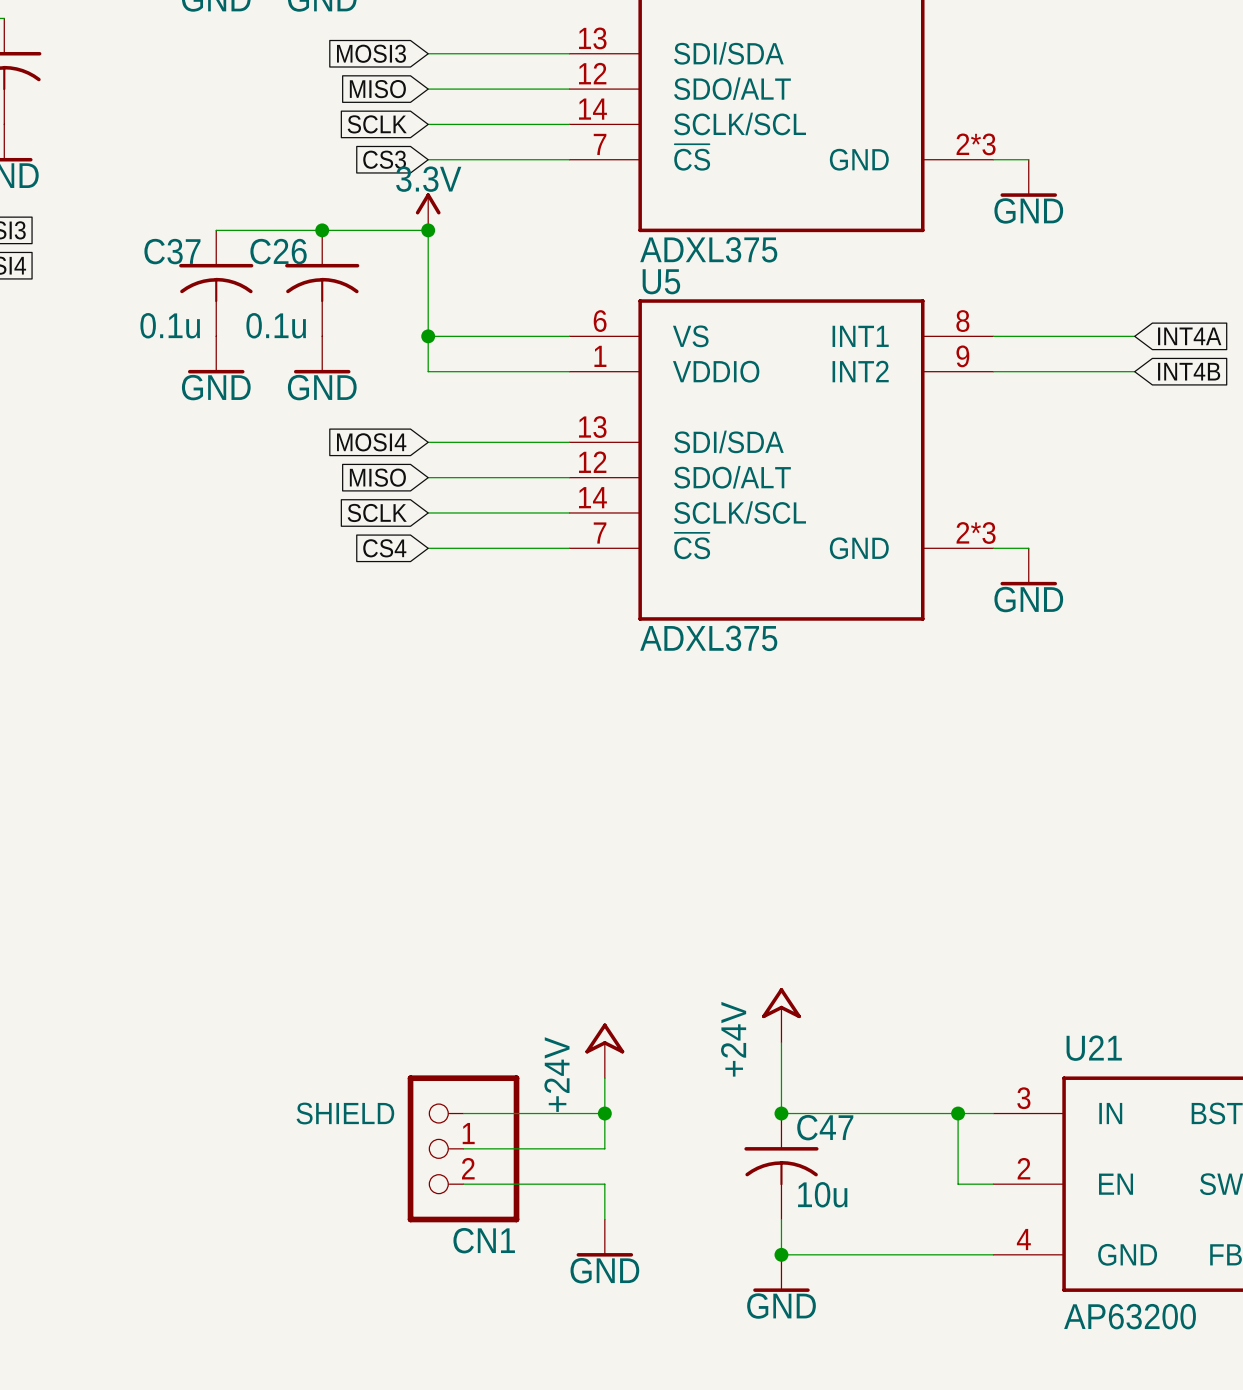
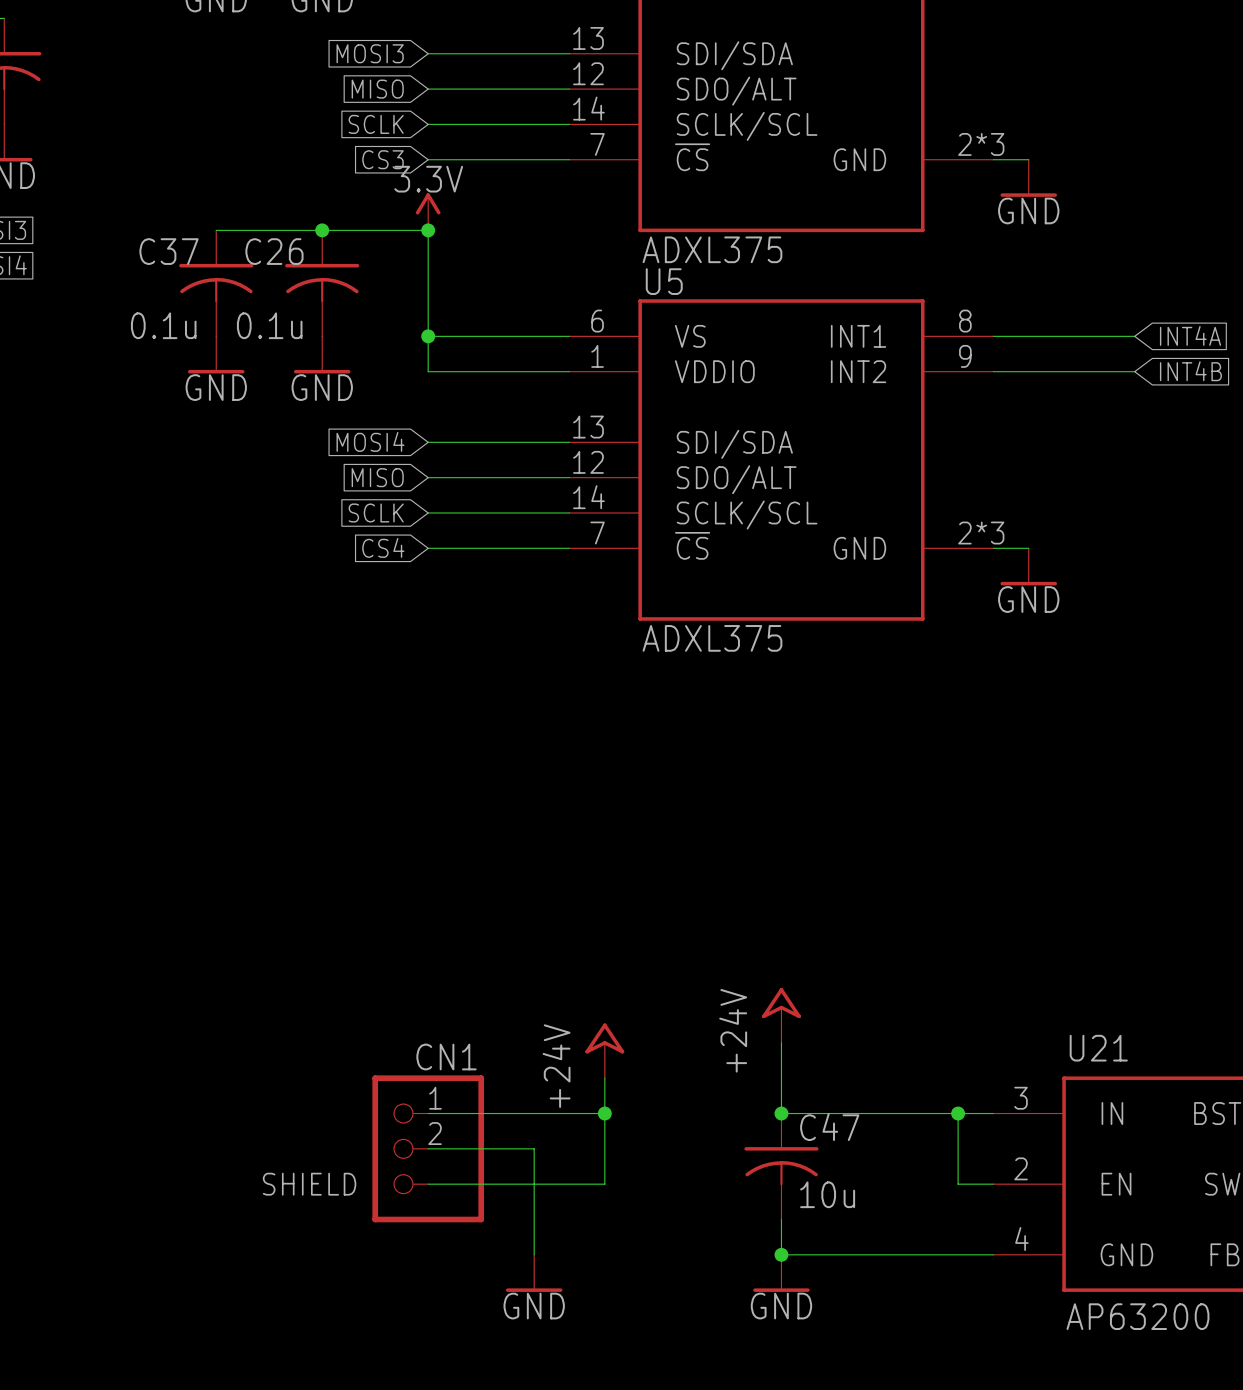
CN1 pin number: none -> 1 (435, 1098)
CN1 pin name: SHIELD (345, 1113) -> none
wire: none -> (428, 1113) (463, 1113)
CN1 pin number: 1 (468, 1133) -> 2 (435, 1133)
wire: none -> (428, 1148) (463, 1148)
CN1 position: (463, 1148) -> (428, 1148)
wire: (534, 1148) (604, 1148) -> (534, 1148) (534, 1254)
CN1 pin number: 2 (468, 1168) -> none
CN1 pin name: none -> SHIELD (309, 1184)
wire: none -> (428, 1184) (463, 1184)
wire: (604, 1184) (604, 1219) -> (604, 1184) (604, 1148)
power symbol position: GND (604, 1238) -> GND (534, 1273)
CN1 name position: CN1 (484, 1240) -> CN1 (446, 1057)

